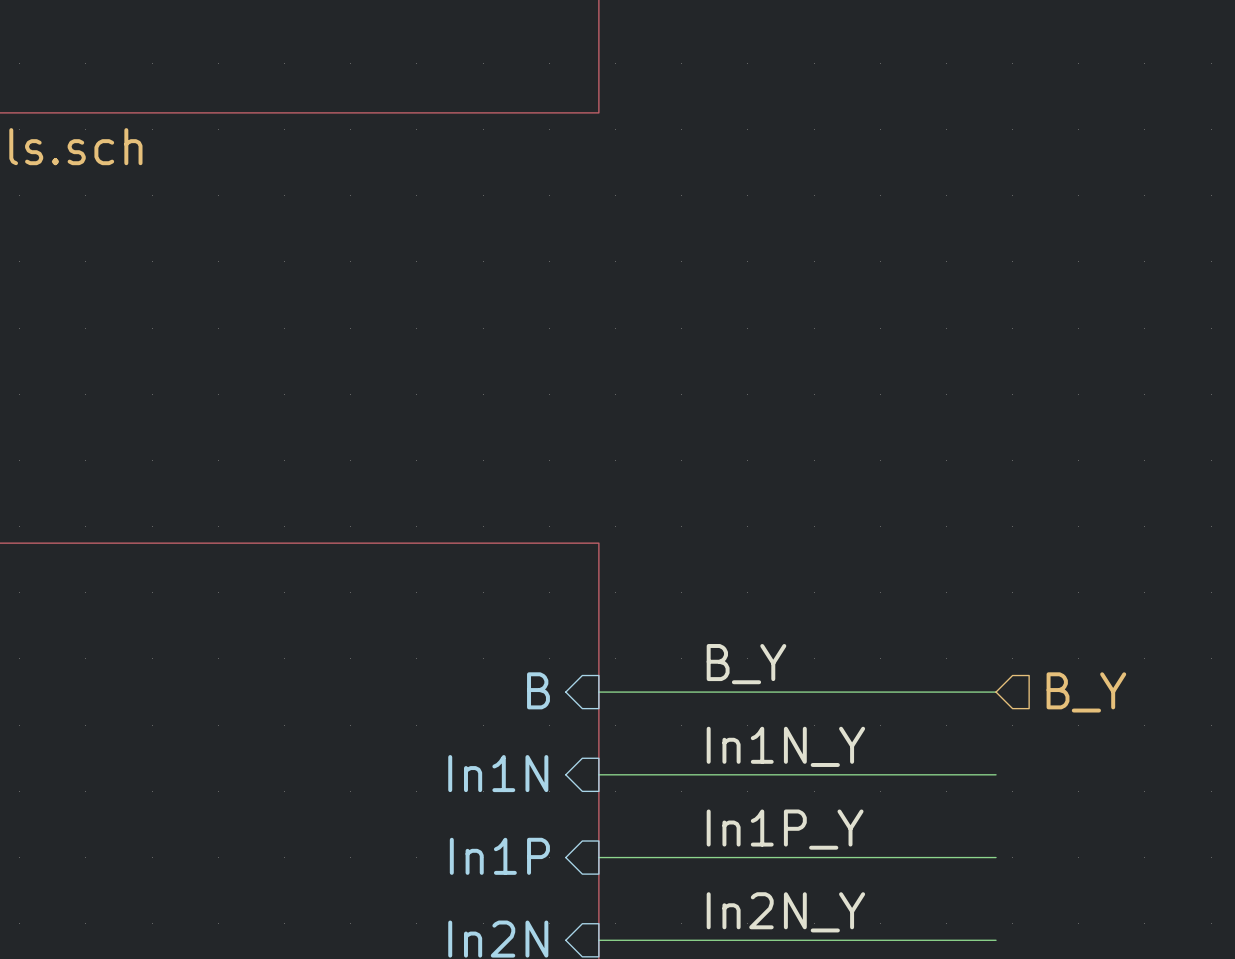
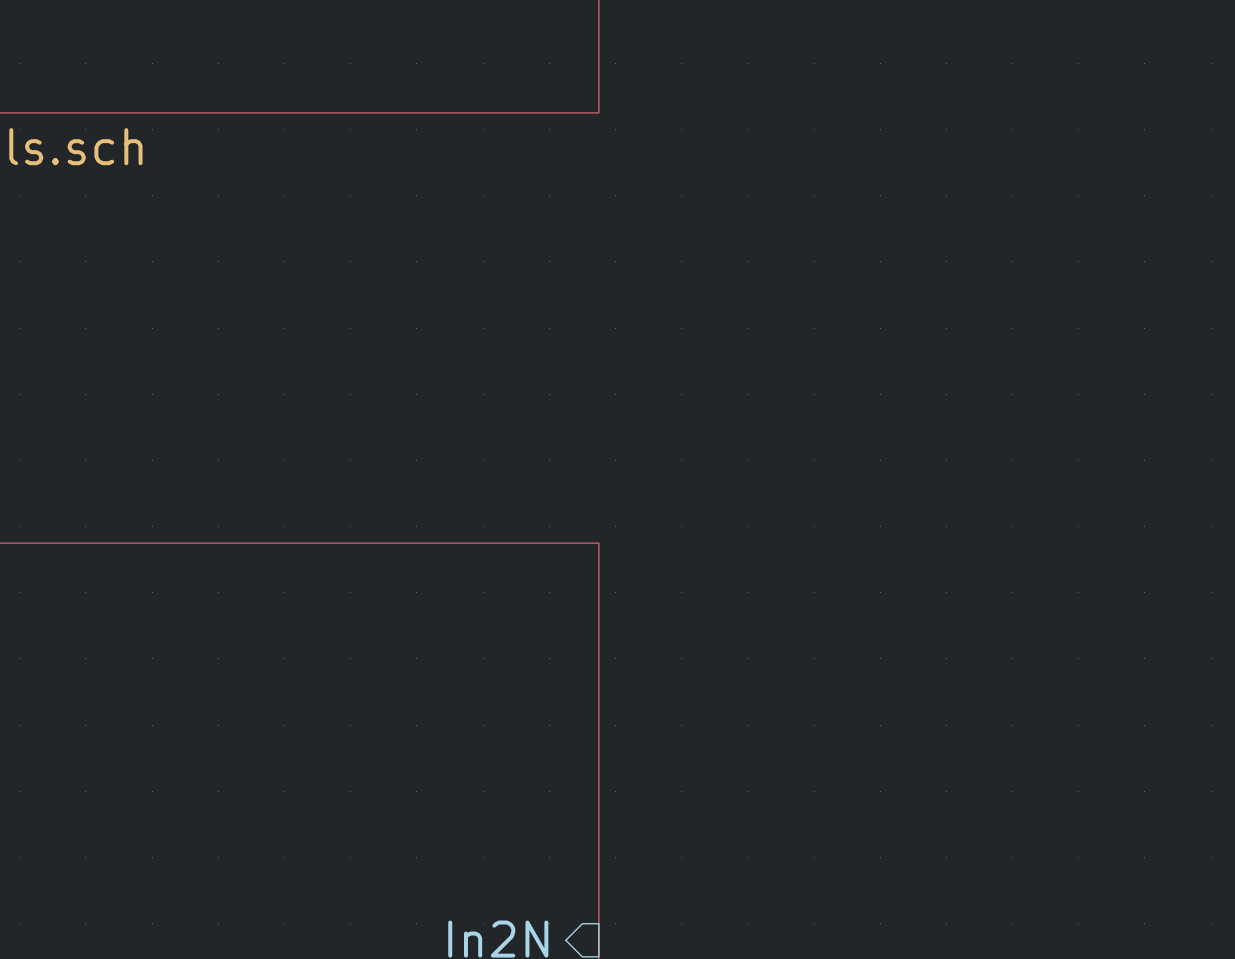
label: B_Y (746, 664) -> none
sheet pin: B (538, 690) -> none
wire: (598, 692) (996, 692) -> none
hierarchical label: B_Y (1086, 692) -> none
label: In1N_Y (785, 746) -> none
sheet pin: In1N (498, 773) -> none
wire: (598, 774) (996, 774) -> none
label: In1P_Y (785, 829) -> none
sheet pin: In1P (499, 856) -> none
wire: (598, 857) (996, 857) -> none
label: In2N_Y (785, 912) -> none
wire: (598, 940) (996, 940) -> none

